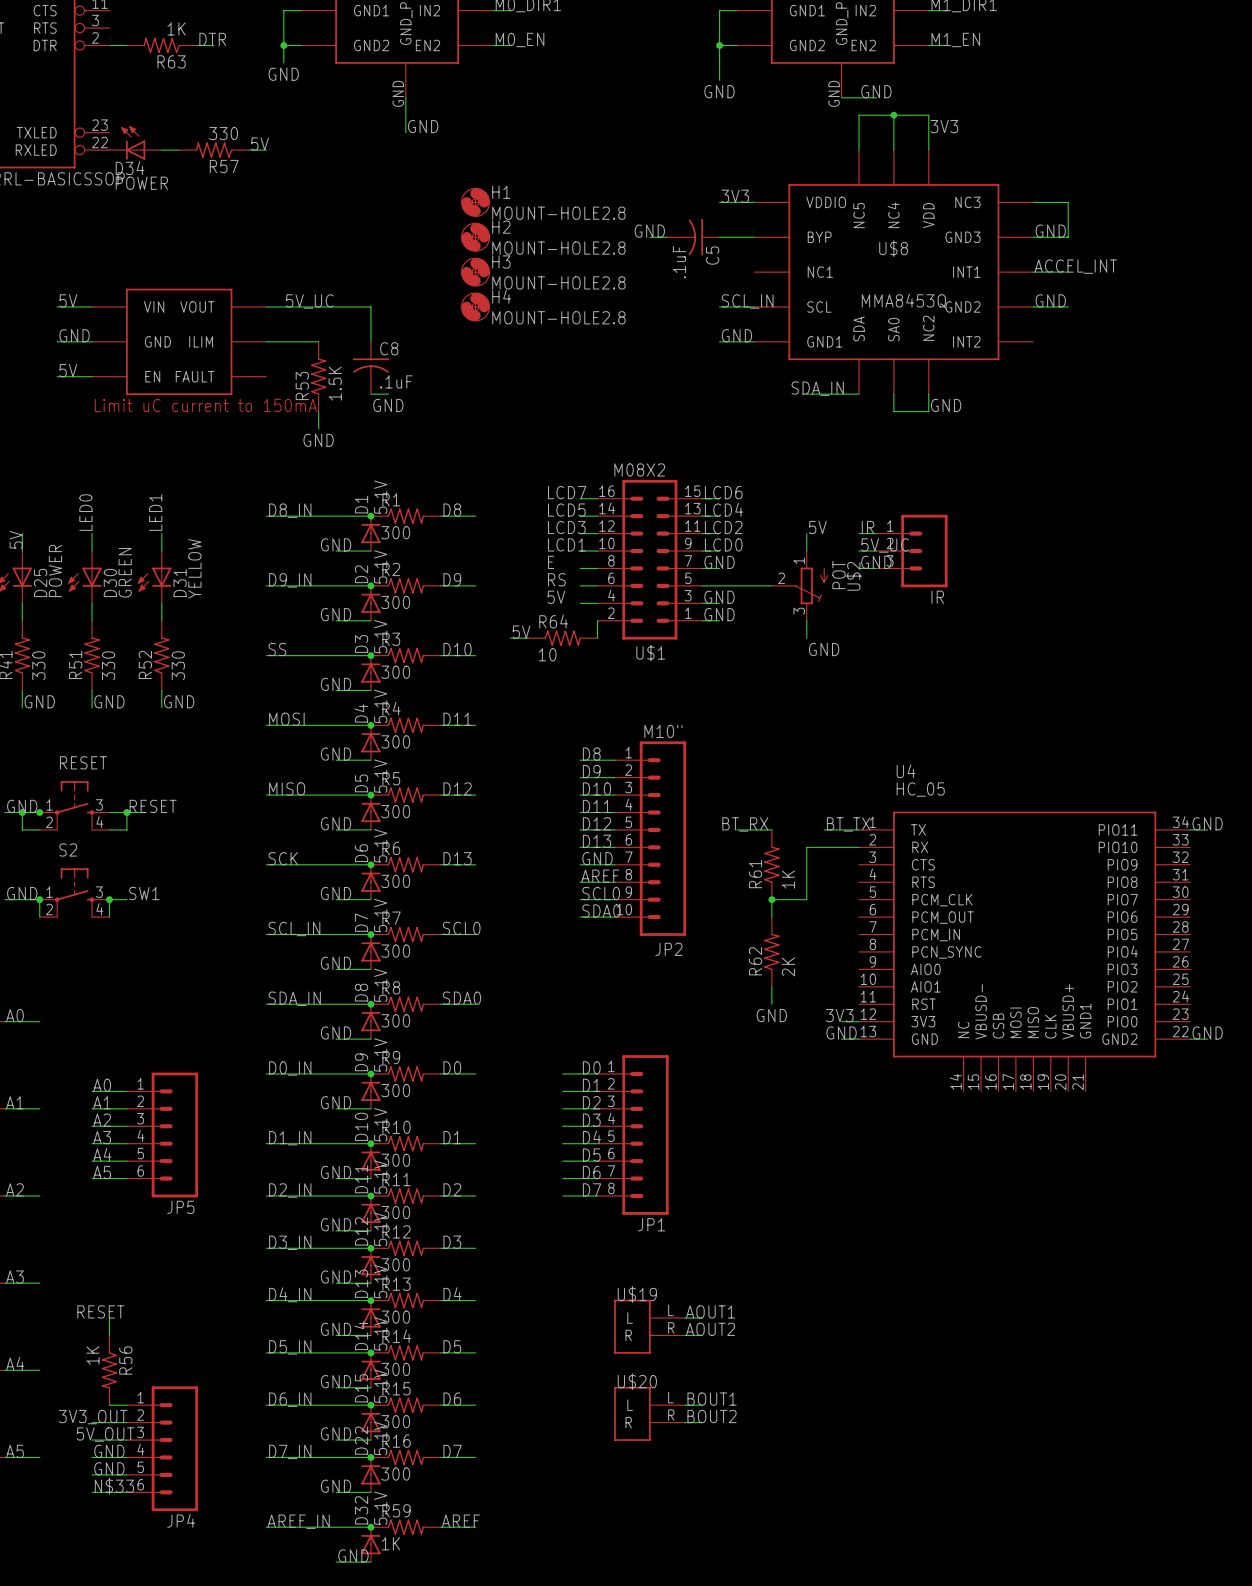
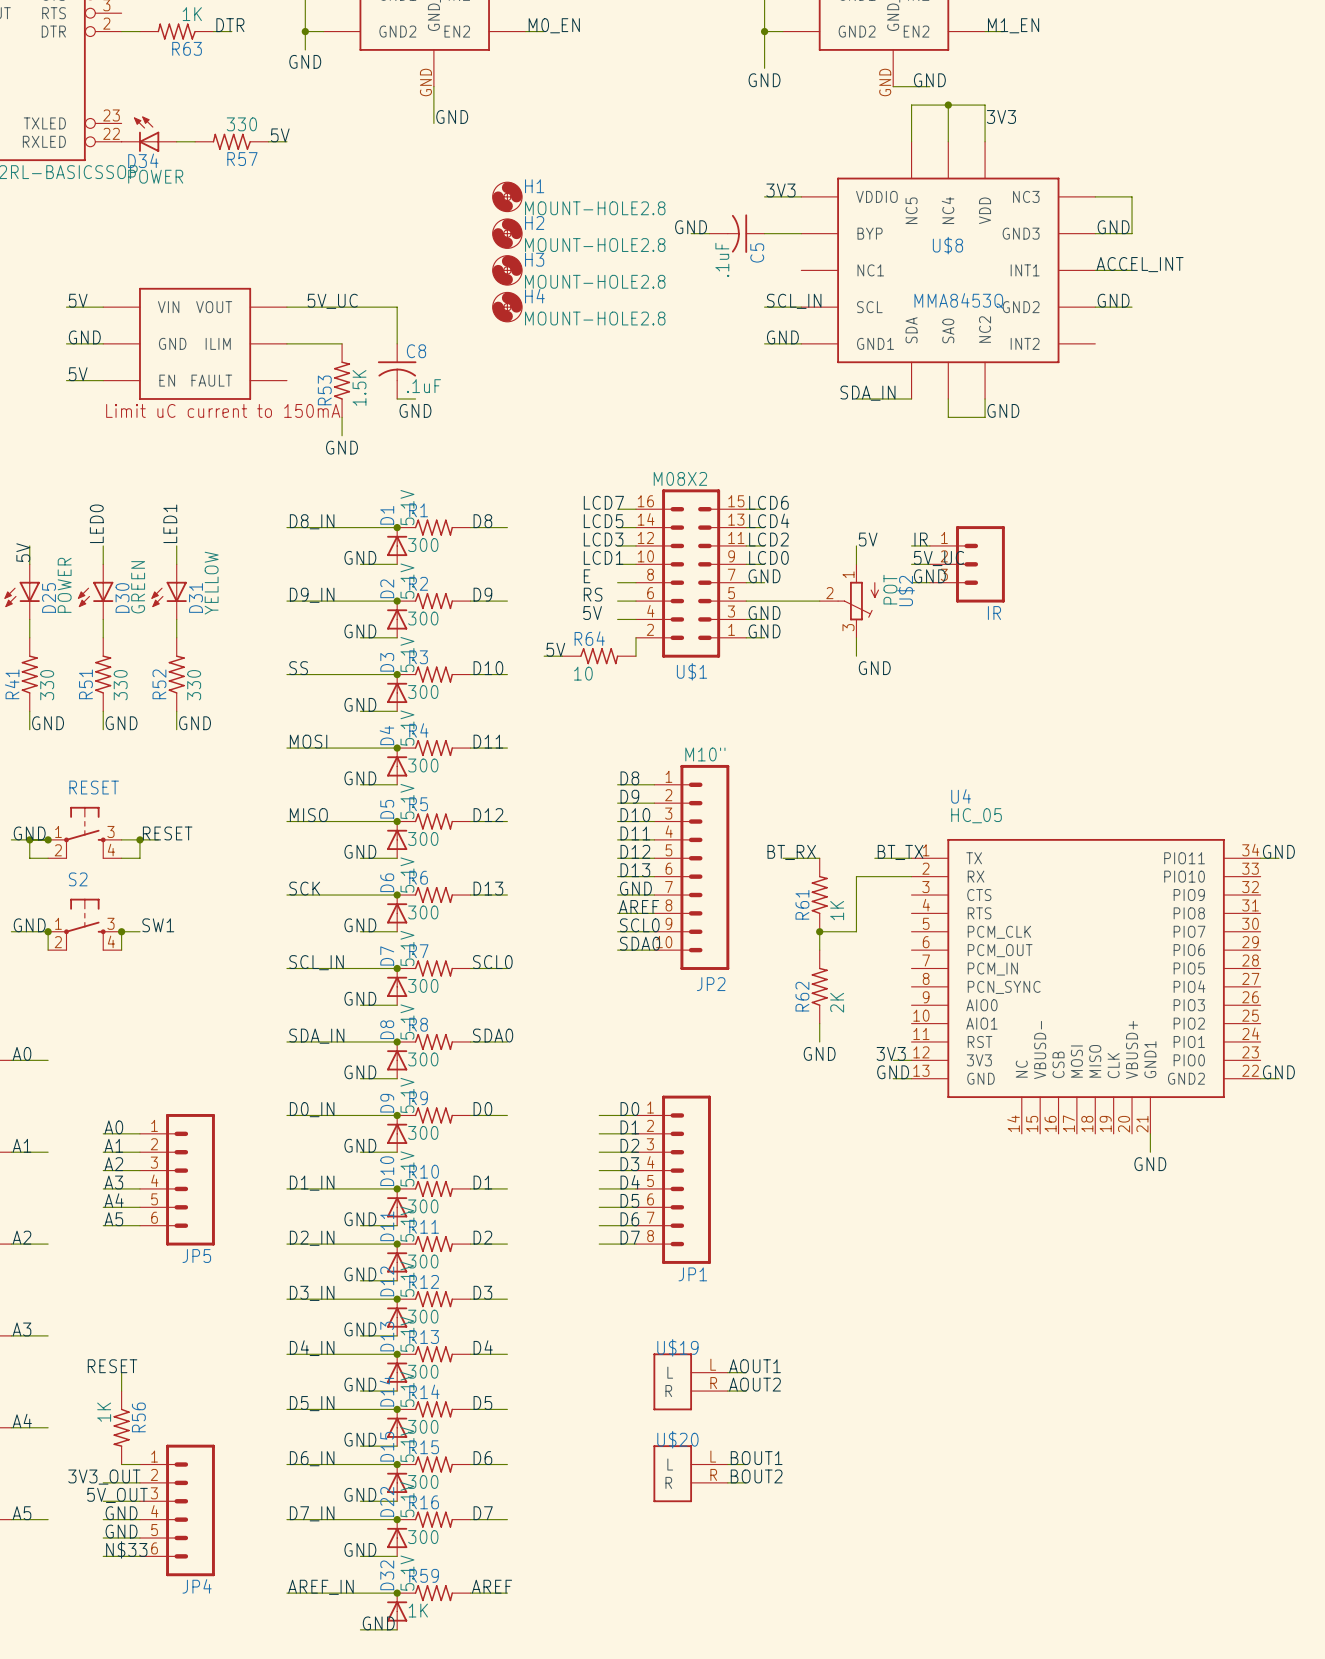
wire: none -> (1150, 1133) (1150, 1152)
label: none -> GND (1150, 1164)

